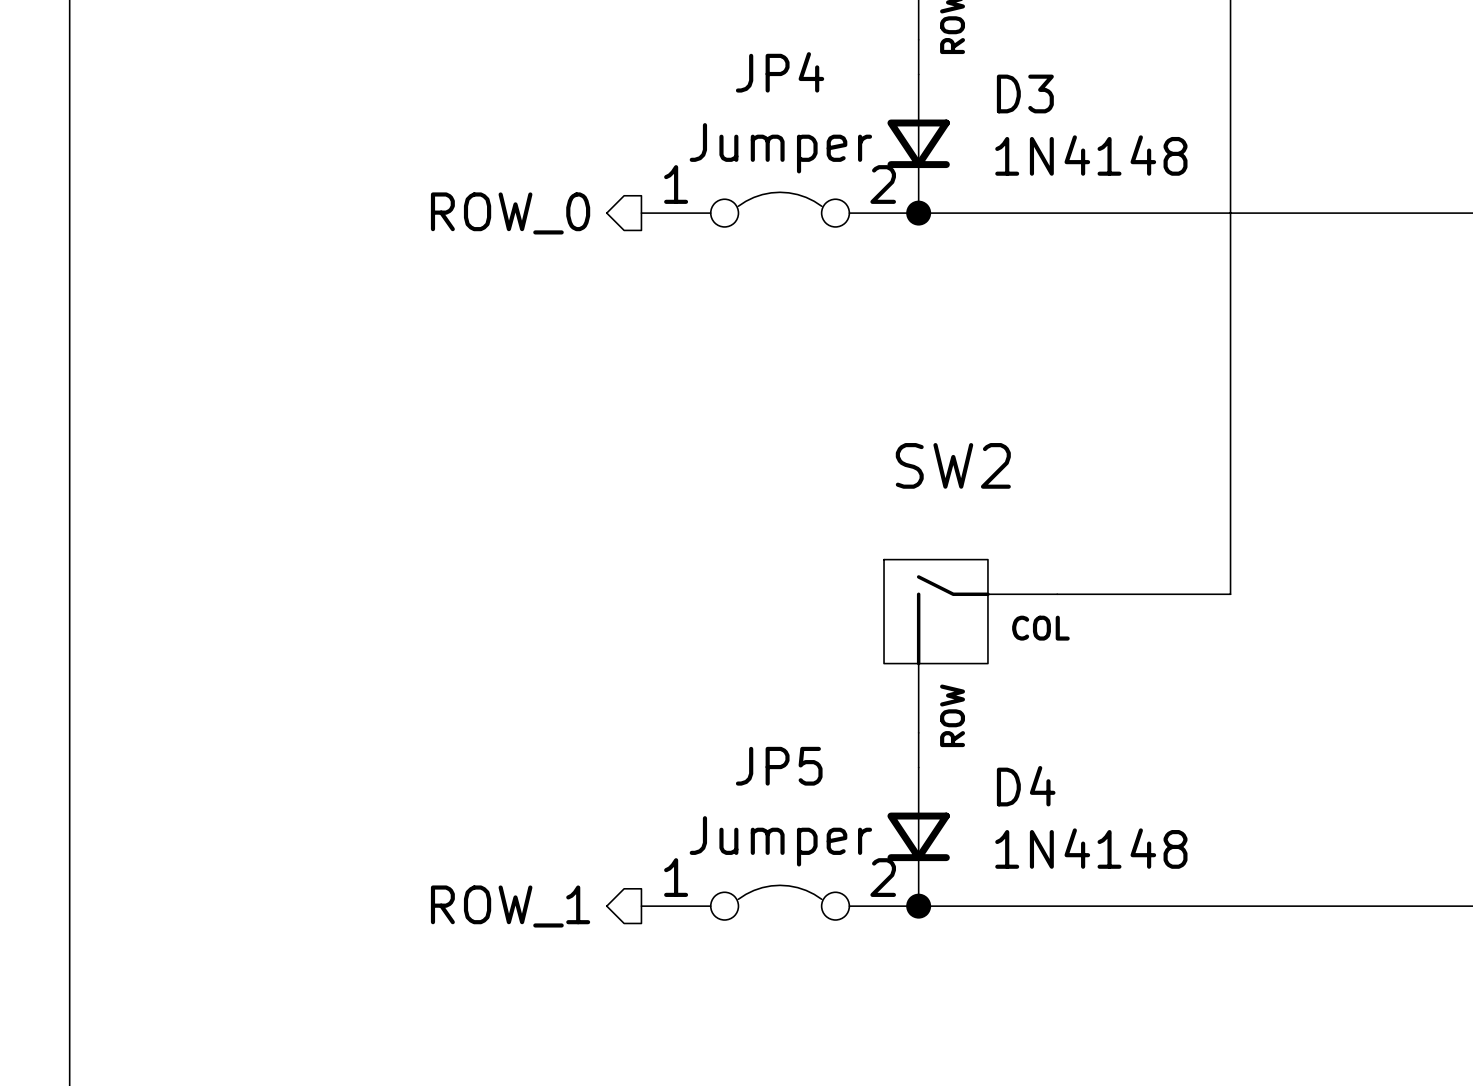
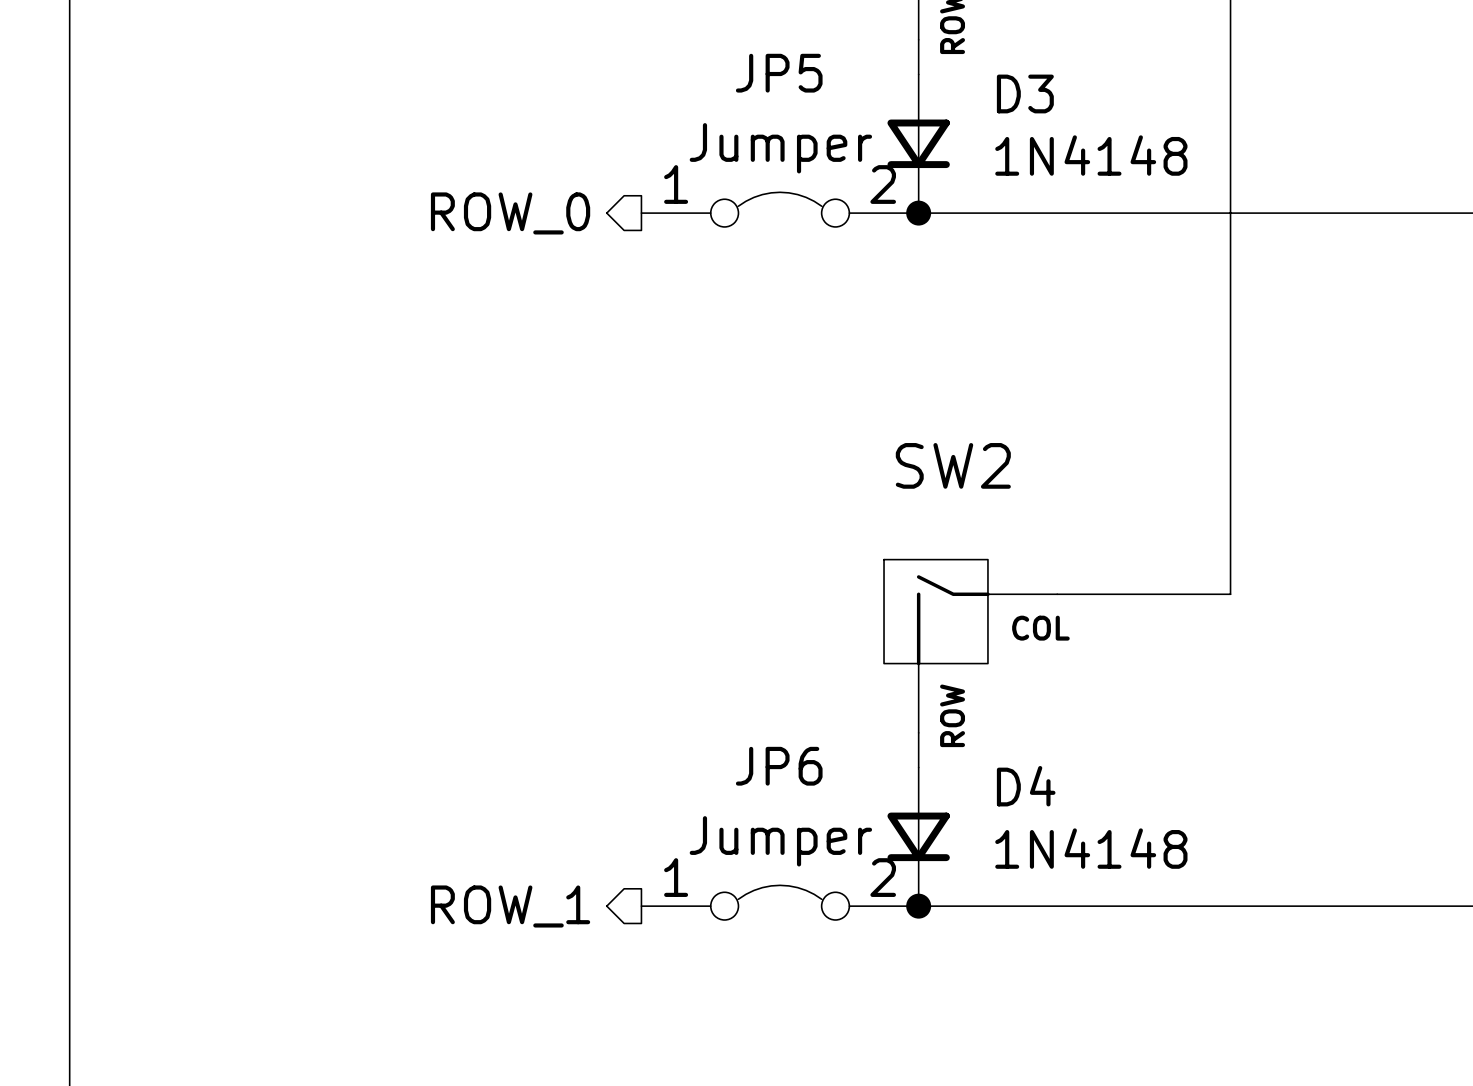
JP4 name: JP4 (780, 72) -> JP5 (779, 73)
JP5 name: JP5 (779, 766) -> JP6 (779, 766)

